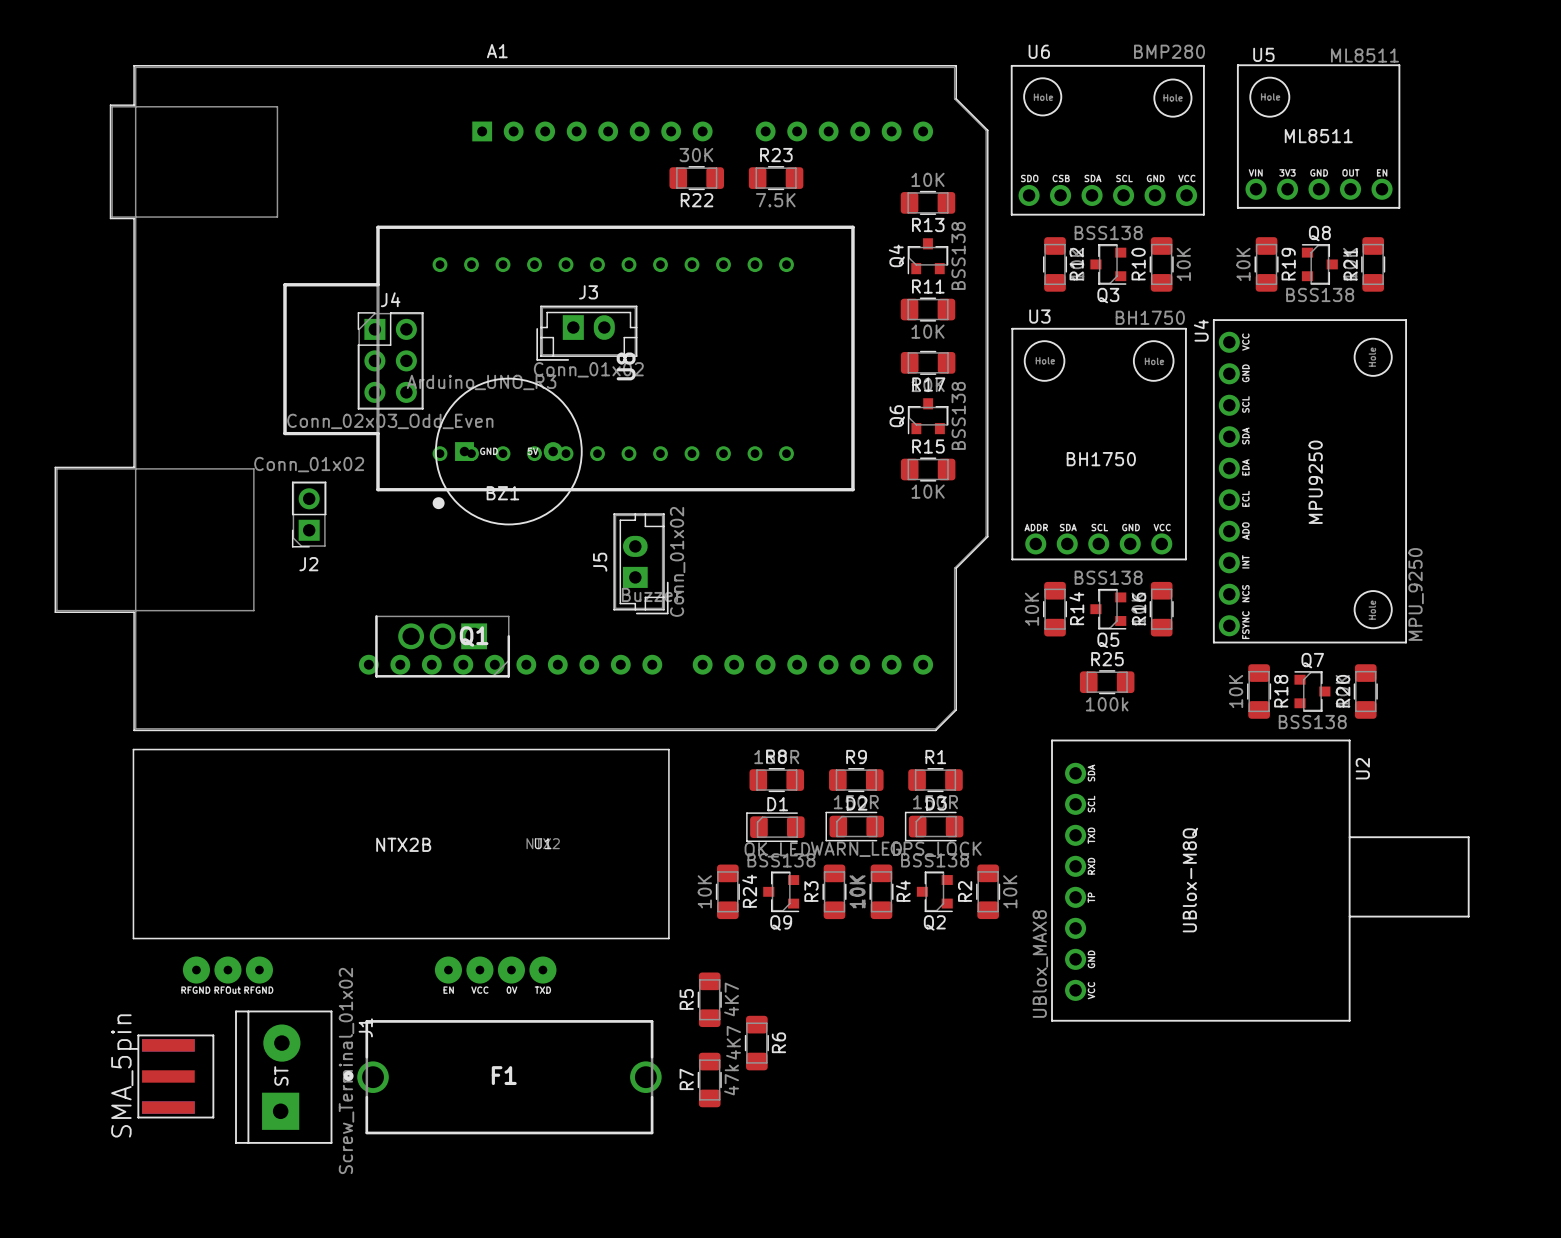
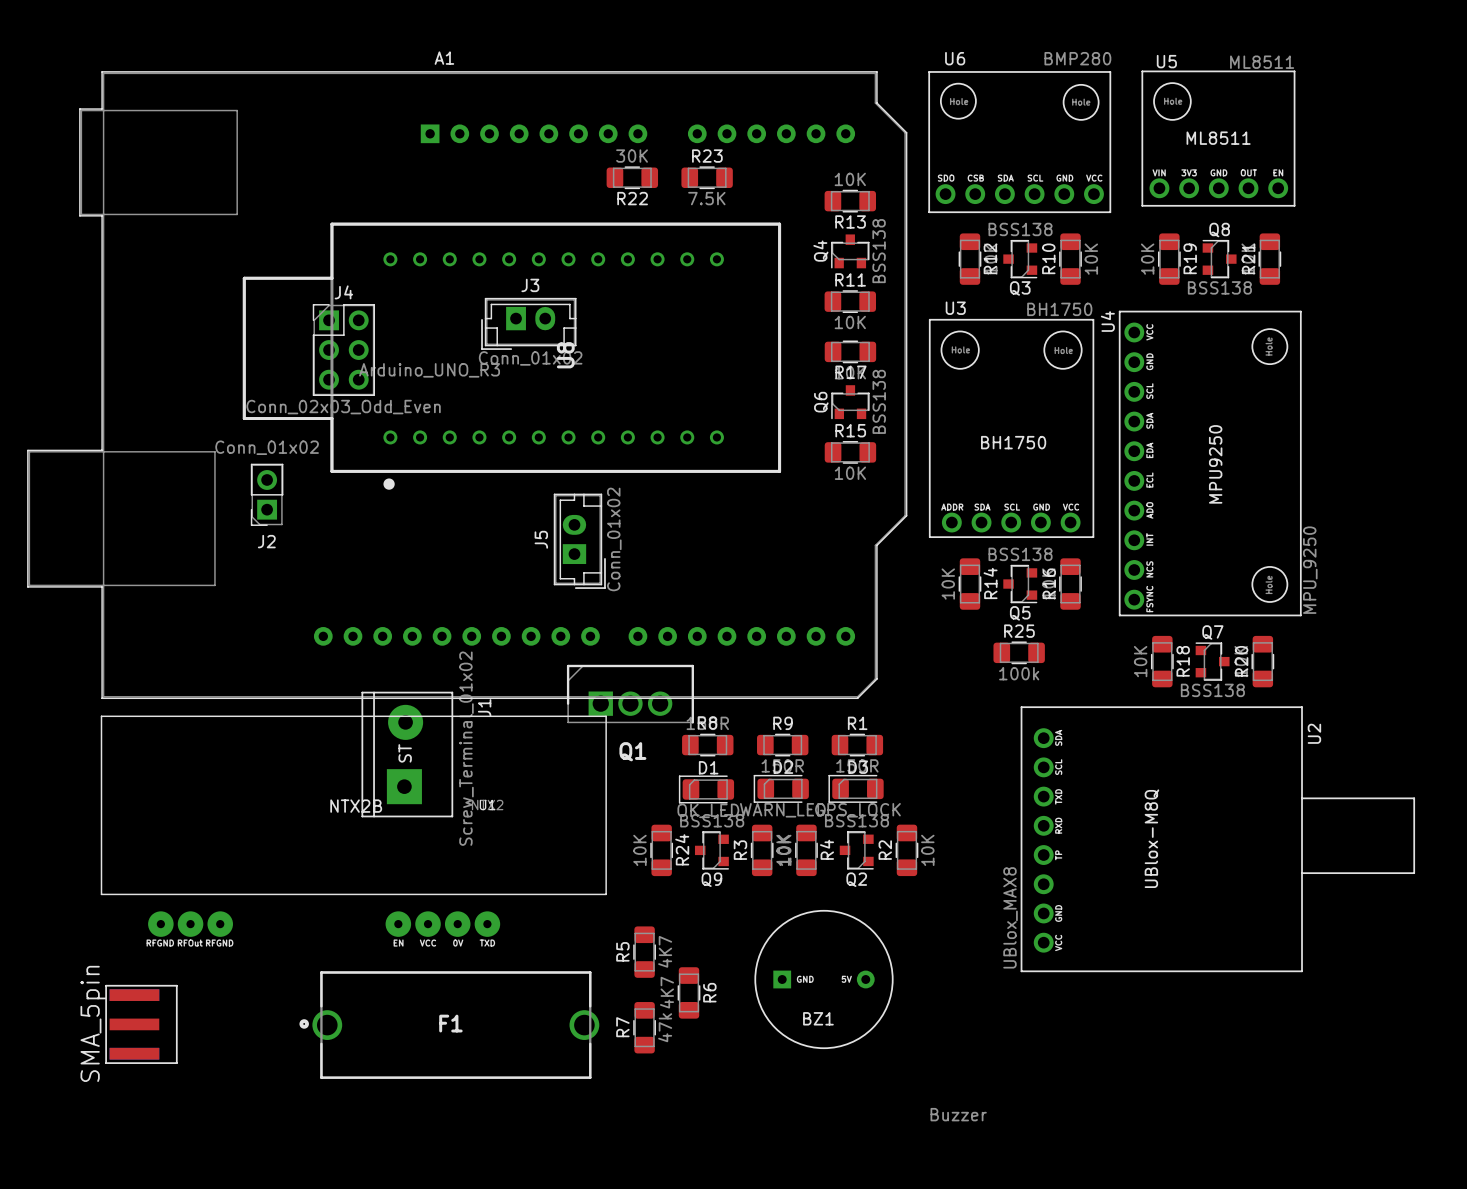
BZ1 position: (508, 451) -> (823, 979)
Q1 name position: Q1 (474, 636) -> Q1 (632, 751)
Q1 rotation: 0° (442, 646) -> 180° (630, 694)
Q1 position: (442, 646) -> (630, 694)
U2 position: (1260, 880) -> (1217, 839)
J1 position: (283, 1077) -> (407, 754)

